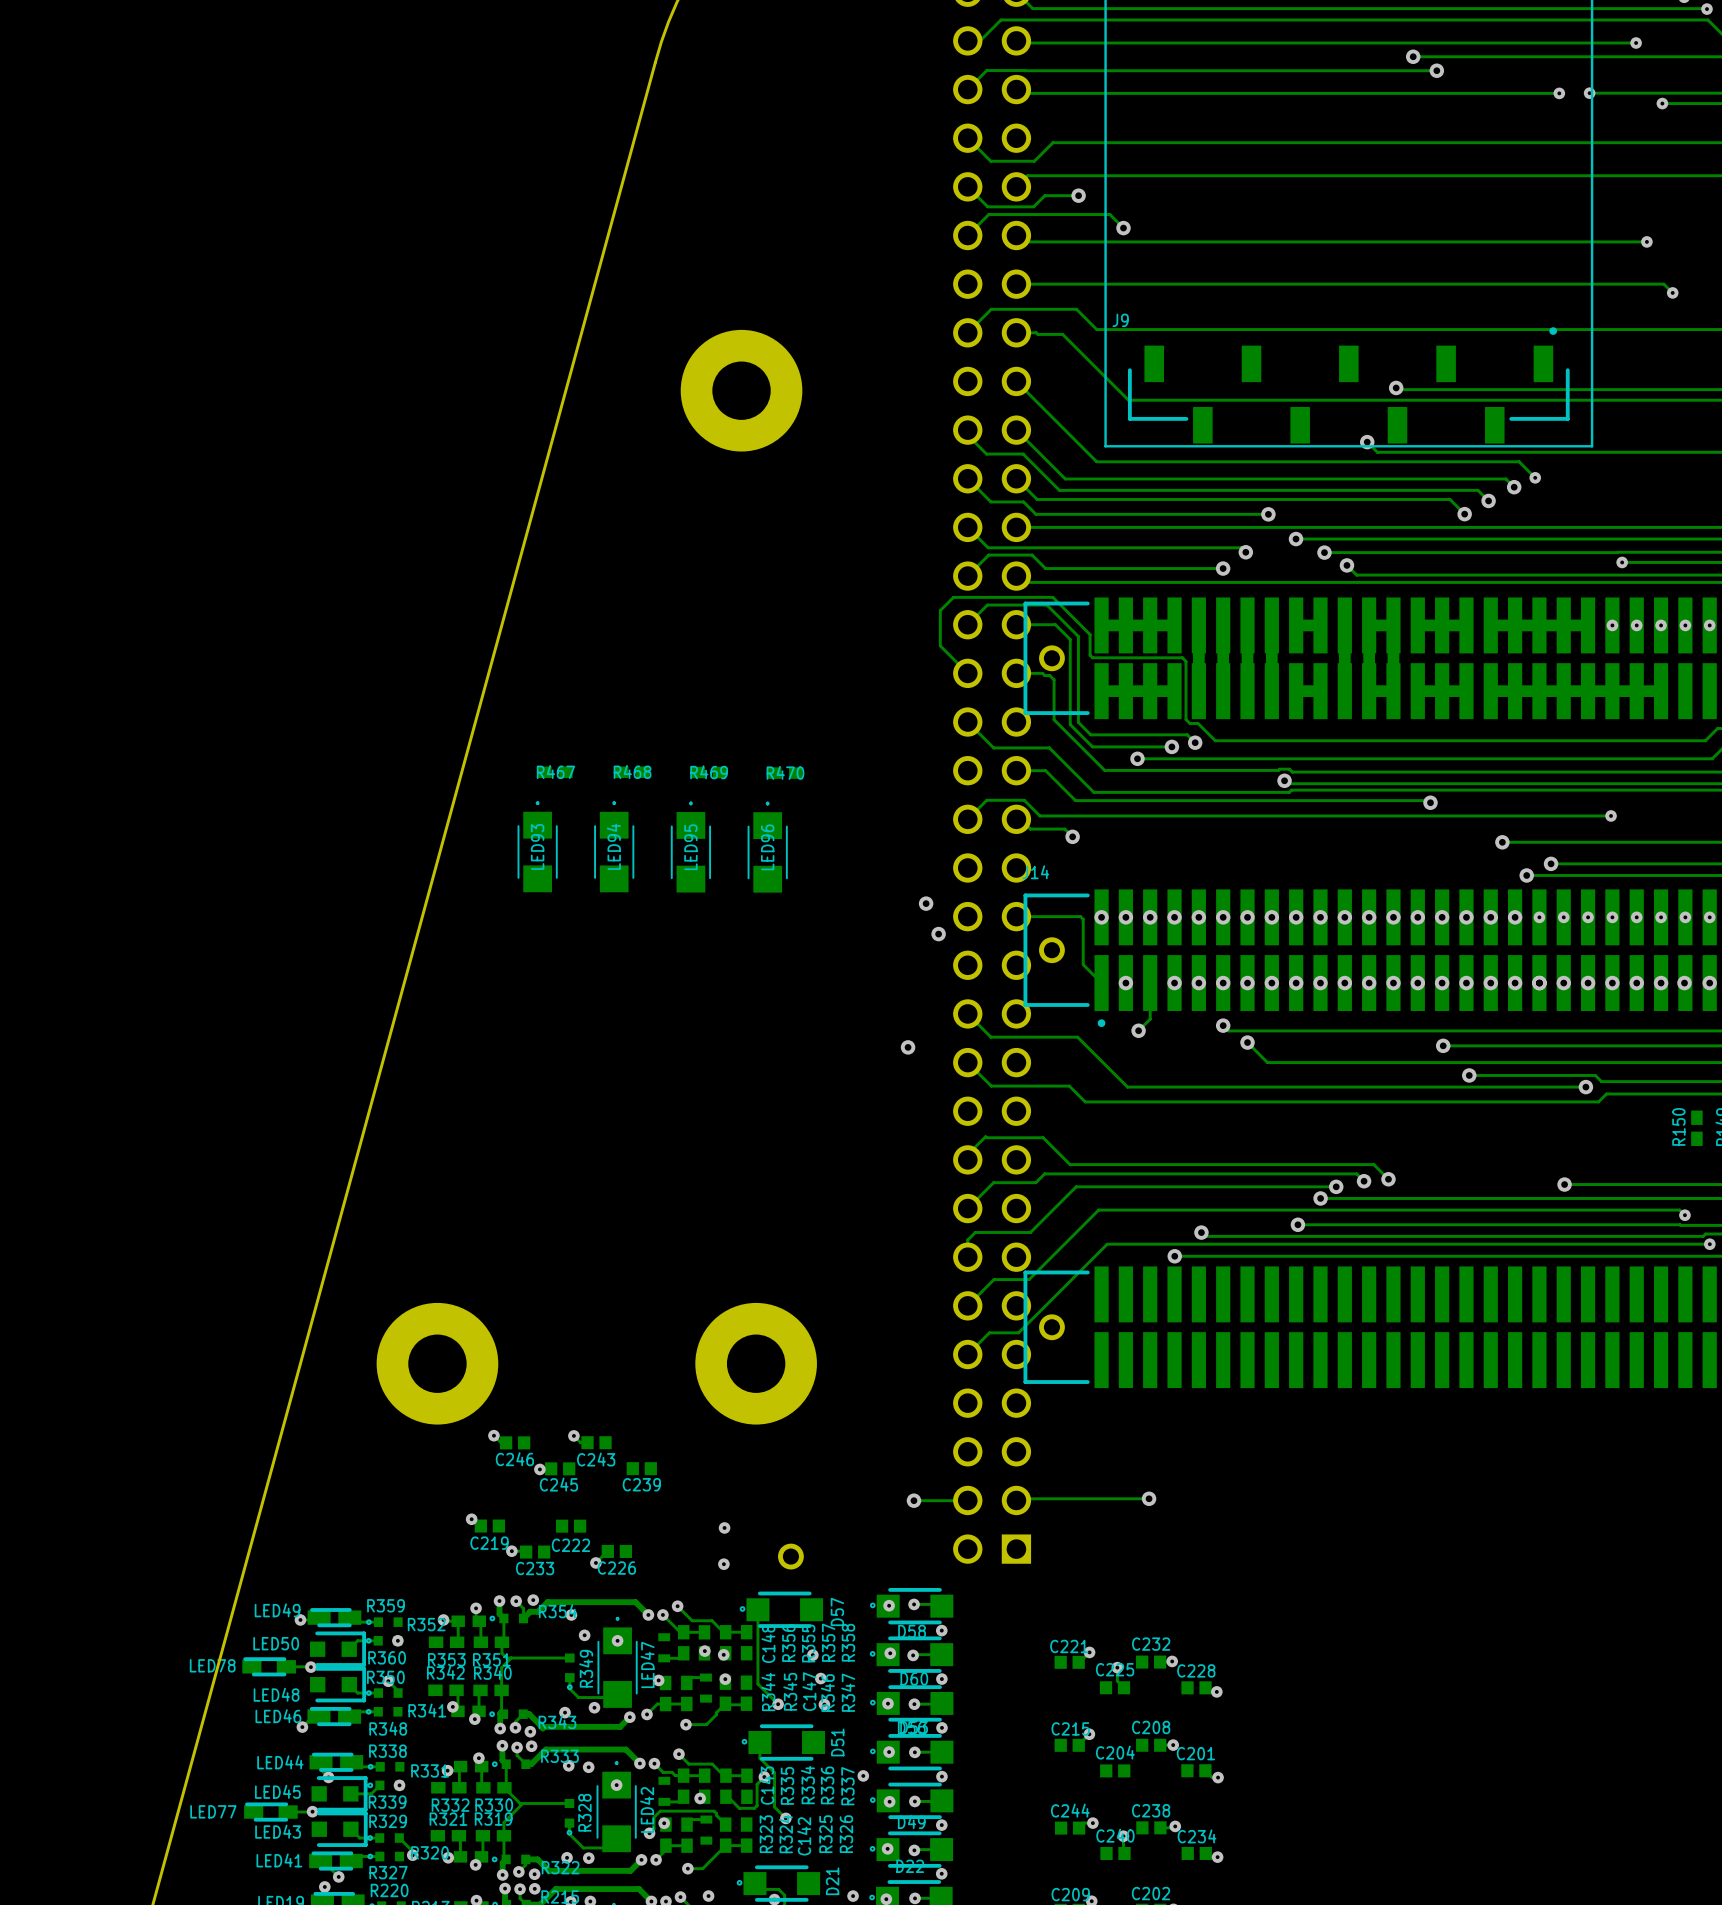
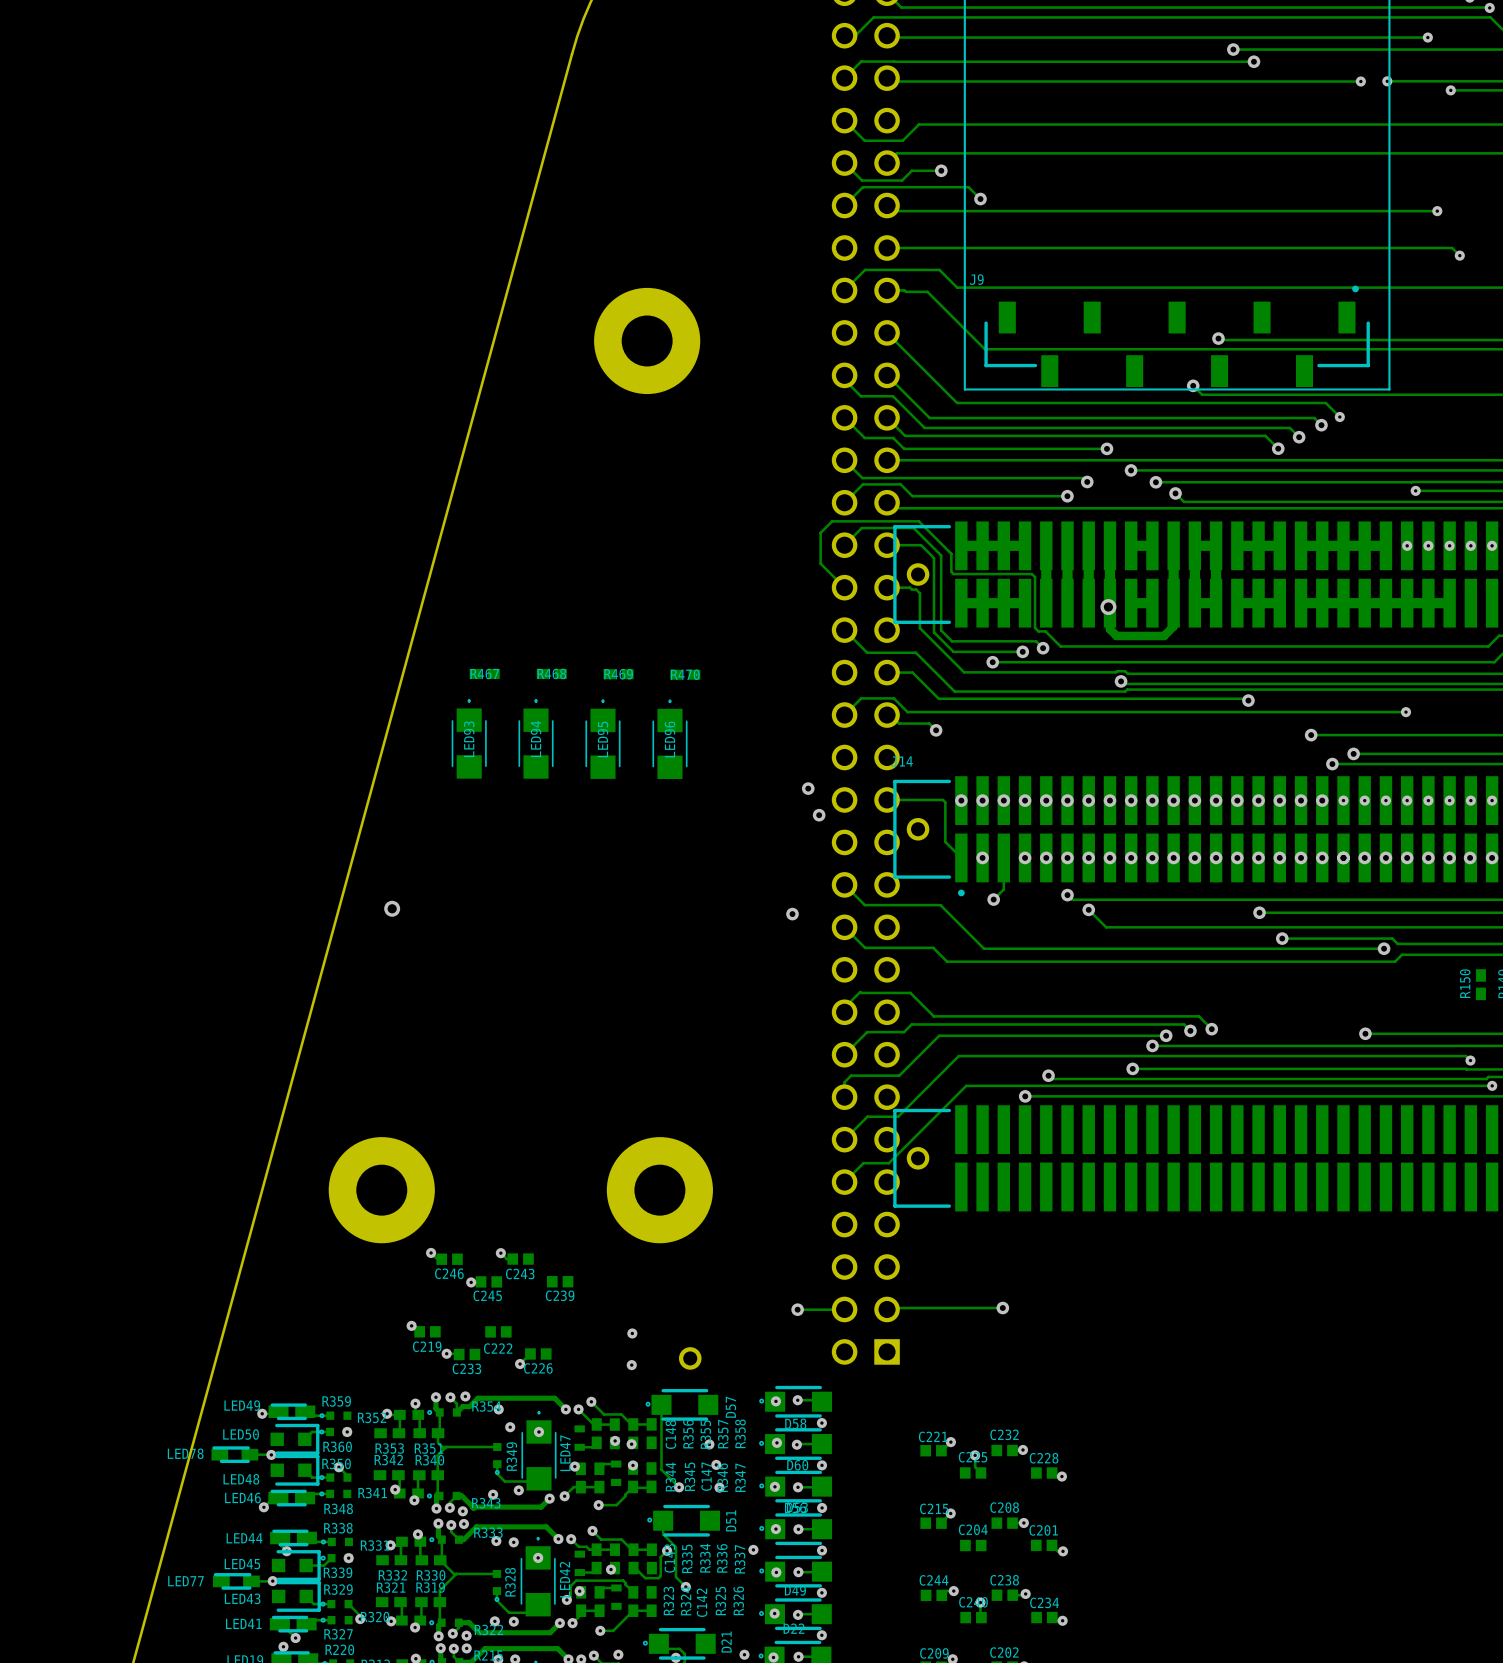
track: none -> (1173, 597) (1173, 626) (1164, 635) (1116, 635) (1109, 629) (1109, 603)
via: none -> (1108, 607)
via: none -> (392, 908)

